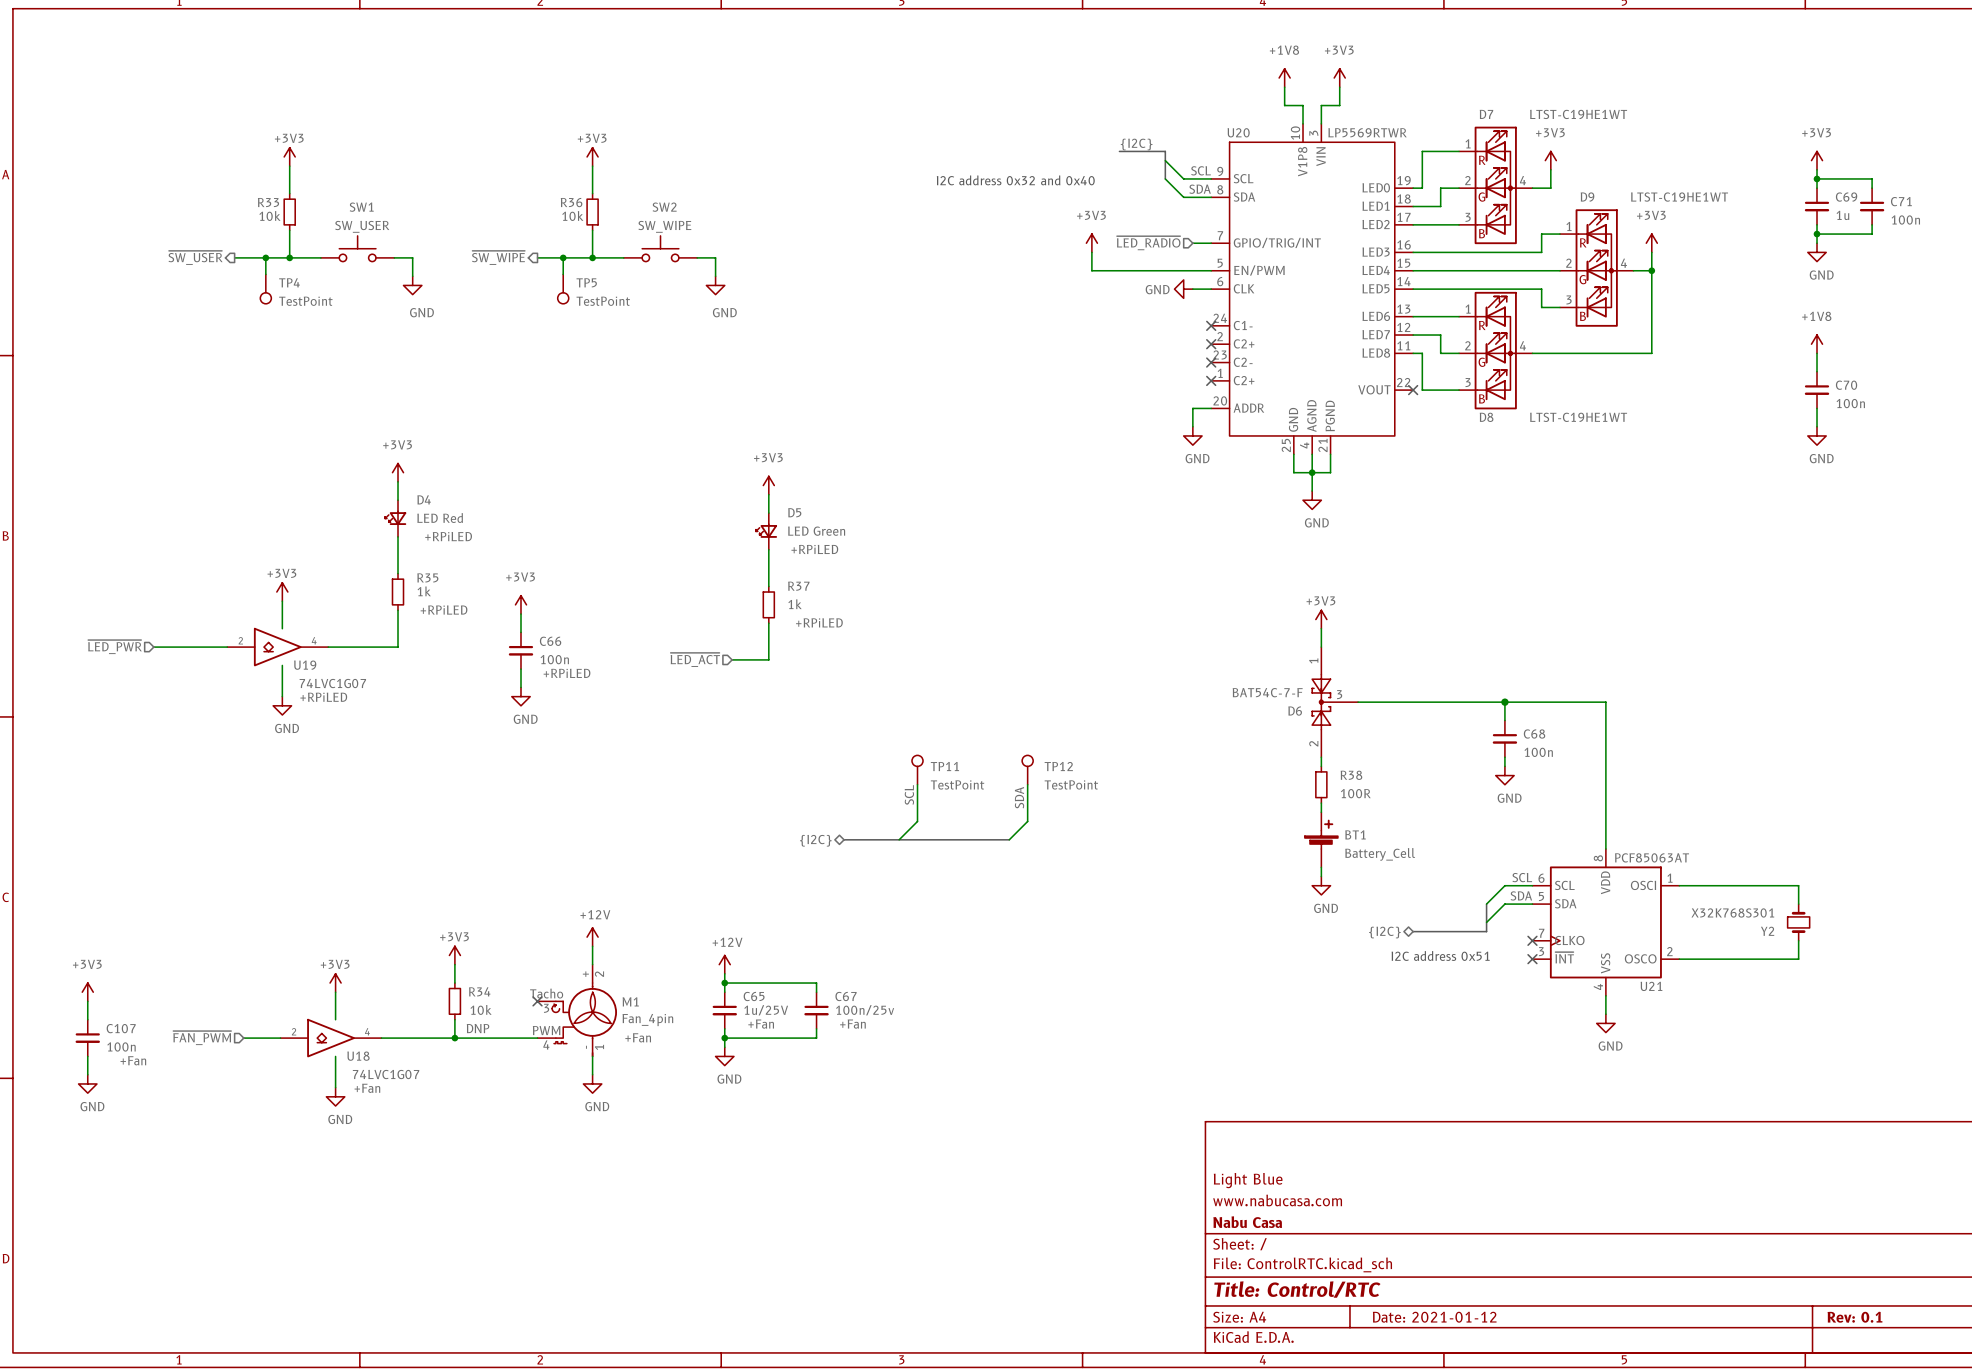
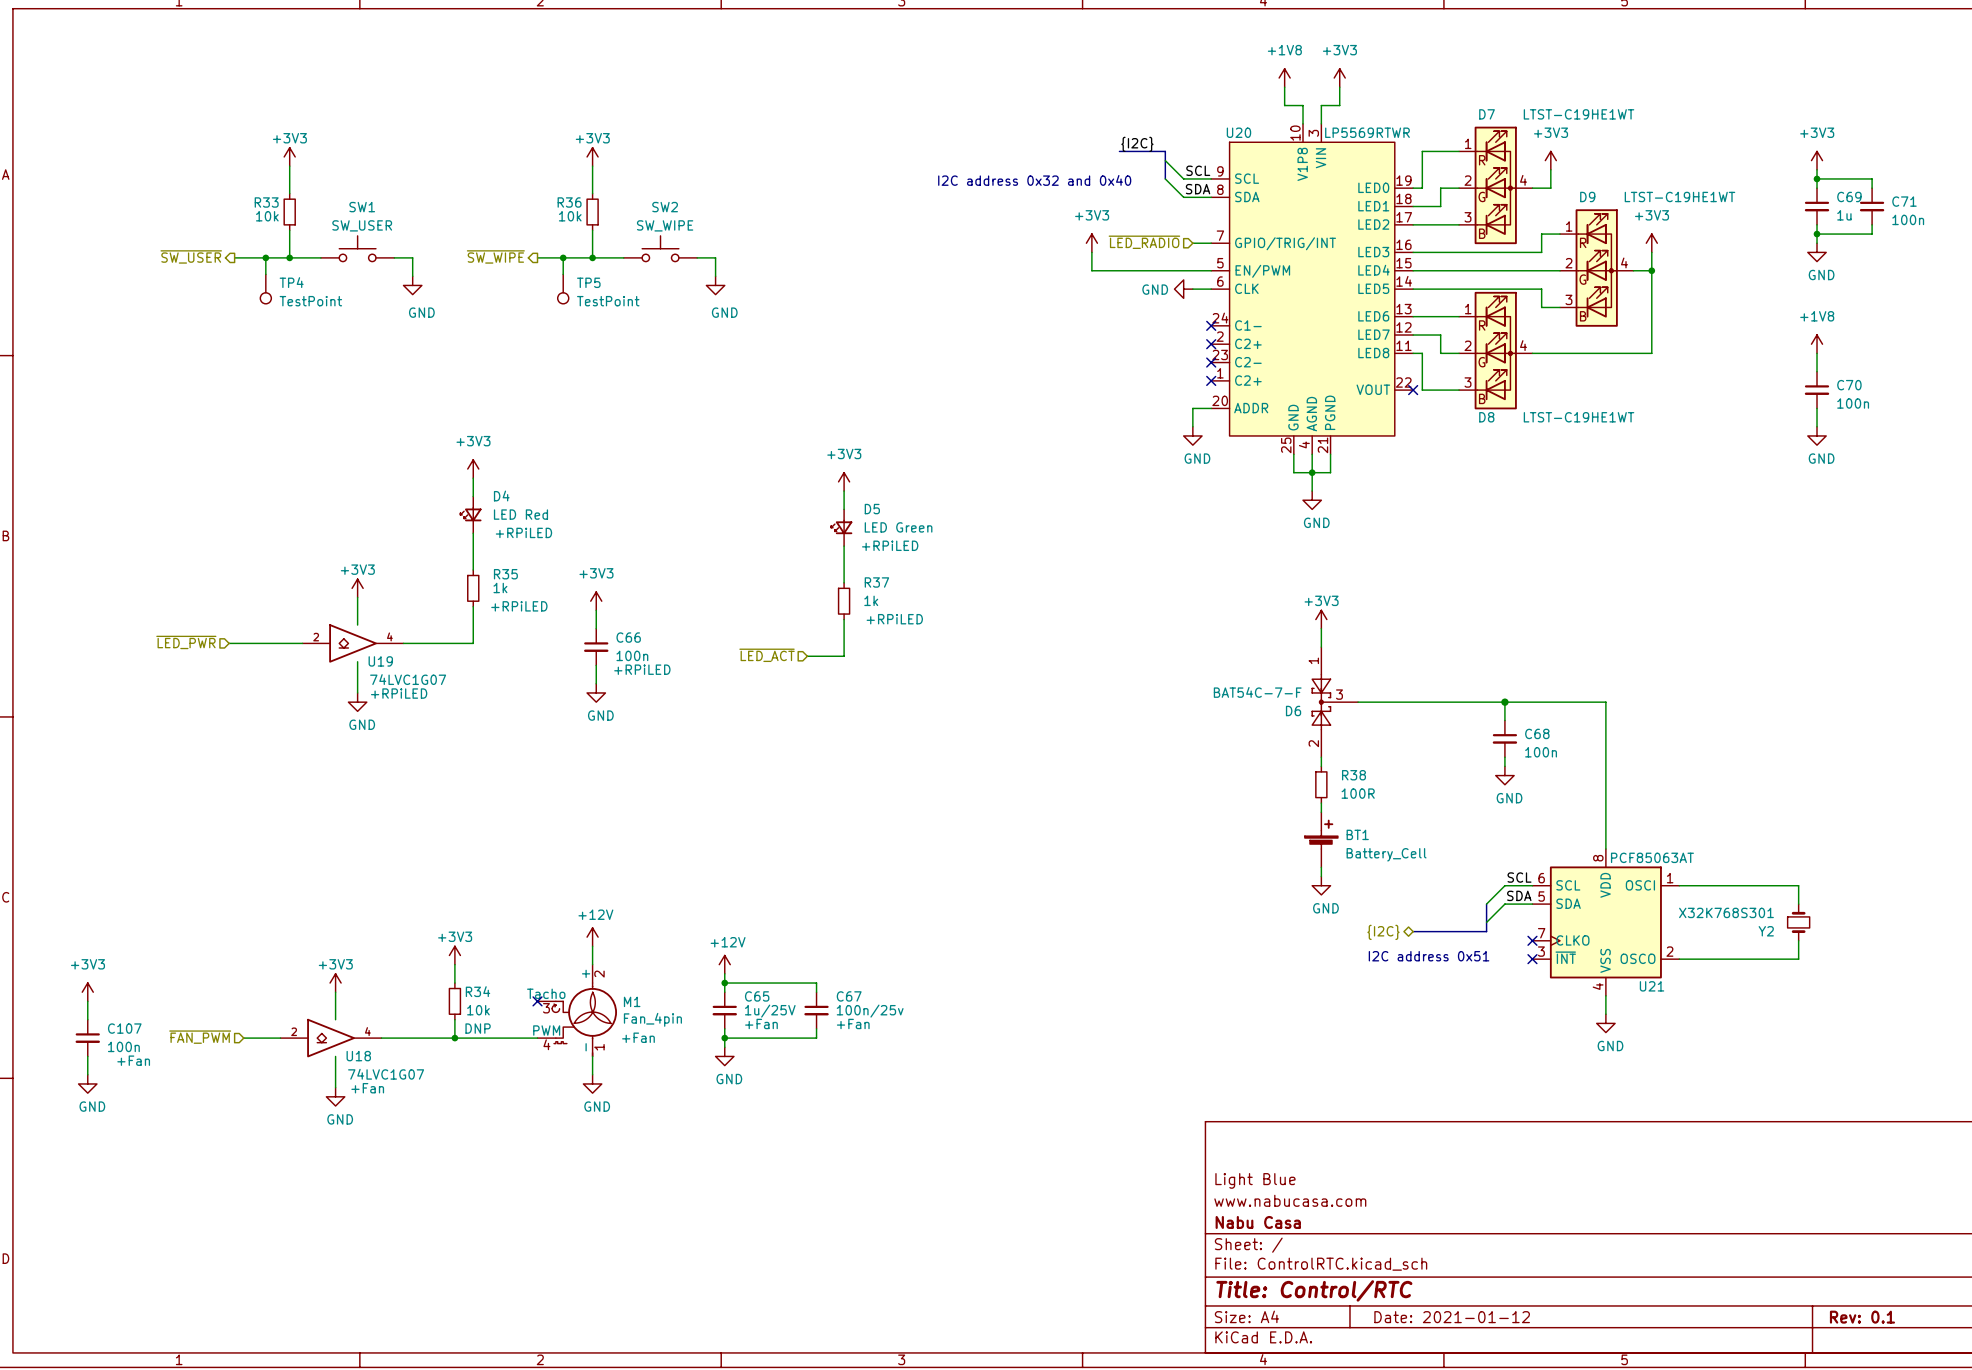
power symbol: none -> +3V3 (473, 469)
power symbol: +3V3 (398, 472) -> none
wire: (398, 481) (398, 500) -> (473, 478) (473, 496)
power symbol position: +3V3 (768, 485) -> +3V3 (844, 481)
wire: (768, 494) (768, 513) -> (844, 491) (844, 509)
D4 position: (395, 518) -> (470, 514)
D5 position: (766, 531) -> (841, 527)
wire: (398, 536) (398, 573) -> (473, 533) (473, 569)
wire: (768, 549) (768, 586) -> (844, 546) (844, 582)
power symbol: none -> +3V3 (357, 588)
power symbol: +3V3 (282, 592) -> none
R35 position: (398, 592) -> (473, 588)
wire: (282, 601) (282, 628) -> (357, 597) (357, 625)
power symbol: none -> +3V3 (596, 601)
power symbol: +3V3 (520, 604) -> none
R37 position: (768, 604) -> (844, 601)
wire: (398, 610) (398, 647) (328, 647) -> (473, 606) (473, 643) (403, 643)
wire: (520, 614) (520, 632) -> (596, 610) (596, 628)
wire: (768, 623) (768, 659) (732, 659) -> (844, 619) (844, 656) (807, 656)
hierarchical label position: ~{LED_PWR} (114, 647) -> ~{LED_PWR} (186, 642)
wire: (153, 647) (227, 647) -> (229, 643) (302, 643)
U19 position: (277, 647) -> (353, 643)
C66 position: (520, 650) -> (596, 647)
hierarchical label position: ~{LED_ACT} (695, 659) -> ~{LED_ACT} (767, 655)
wire: (282, 665) (282, 696) -> (357, 661) (357, 692)
wire: (520, 669) (520, 687) -> (596, 665) (596, 683)
power symbol position: GND (520, 696) -> GND (596, 692)
power symbol position: GND (282, 705) -> GND (357, 702)
TP11: TestPoint (917, 770) -> none
TP12: TestPoint (1027, 770) -> none
wire: (917, 784) (917, 821) (899, 839) -> none
wire: (1027, 784) (1027, 821) (1009, 839) -> none
label: SCL (909, 794) -> none
label: SDA (1019, 797) -> none
bus: (844, 839) (1009, 839) -> none
hierarchical label: {I2C} (815, 840) -> none

